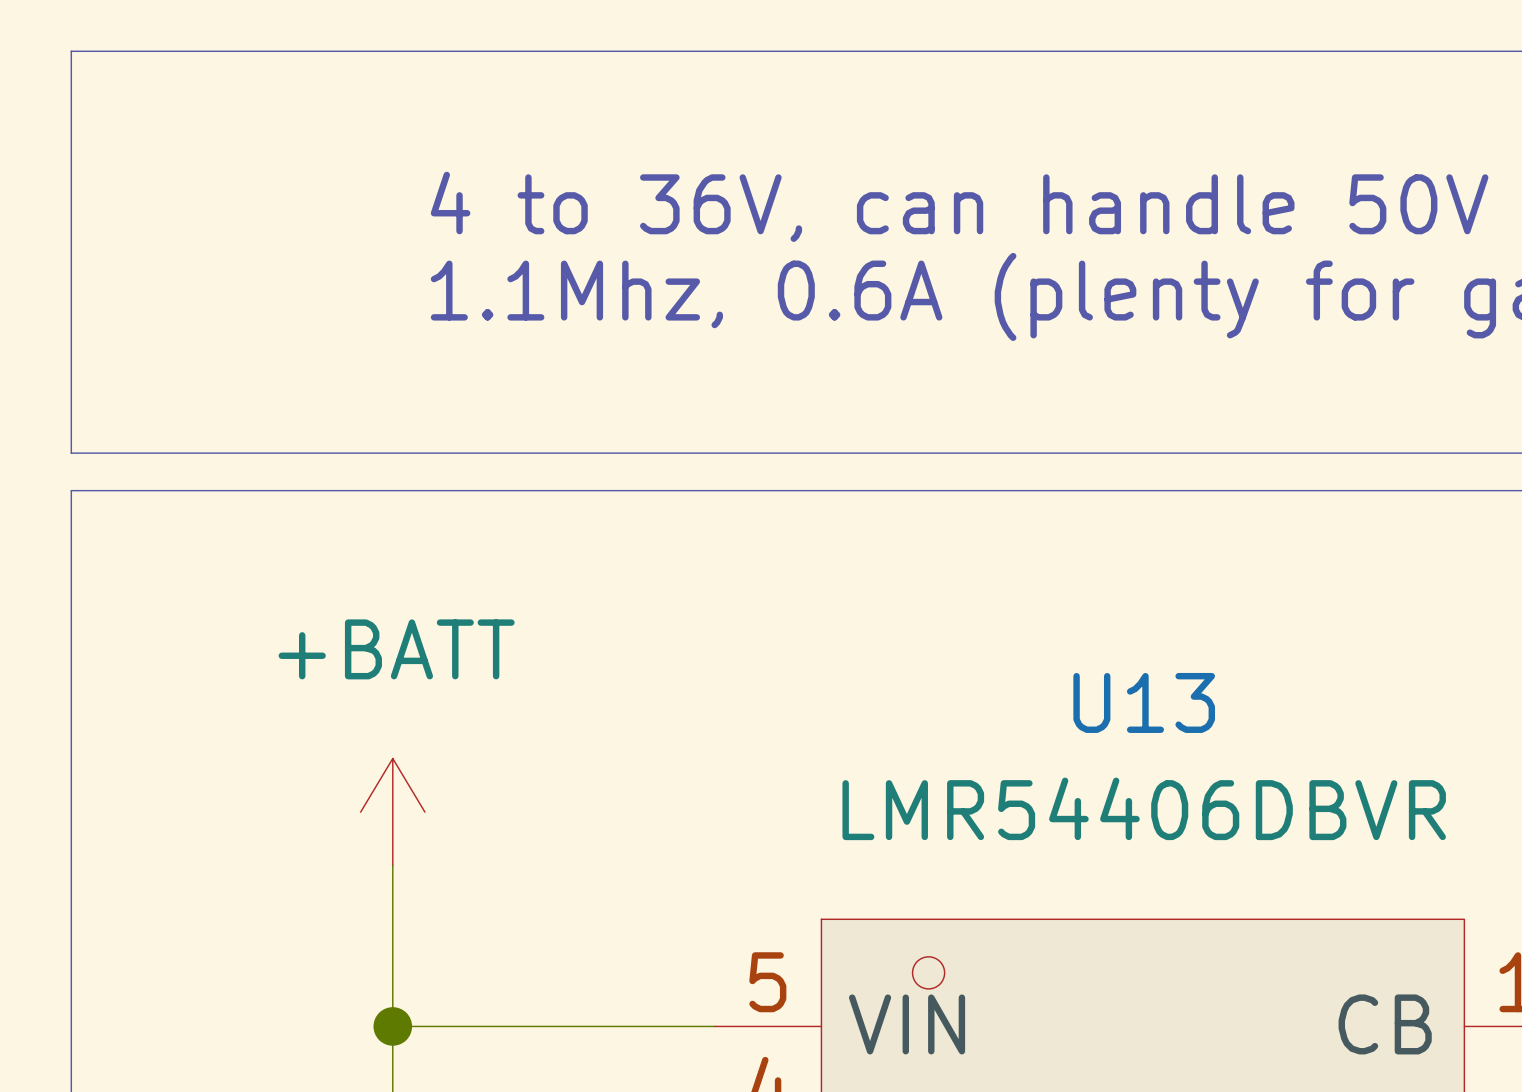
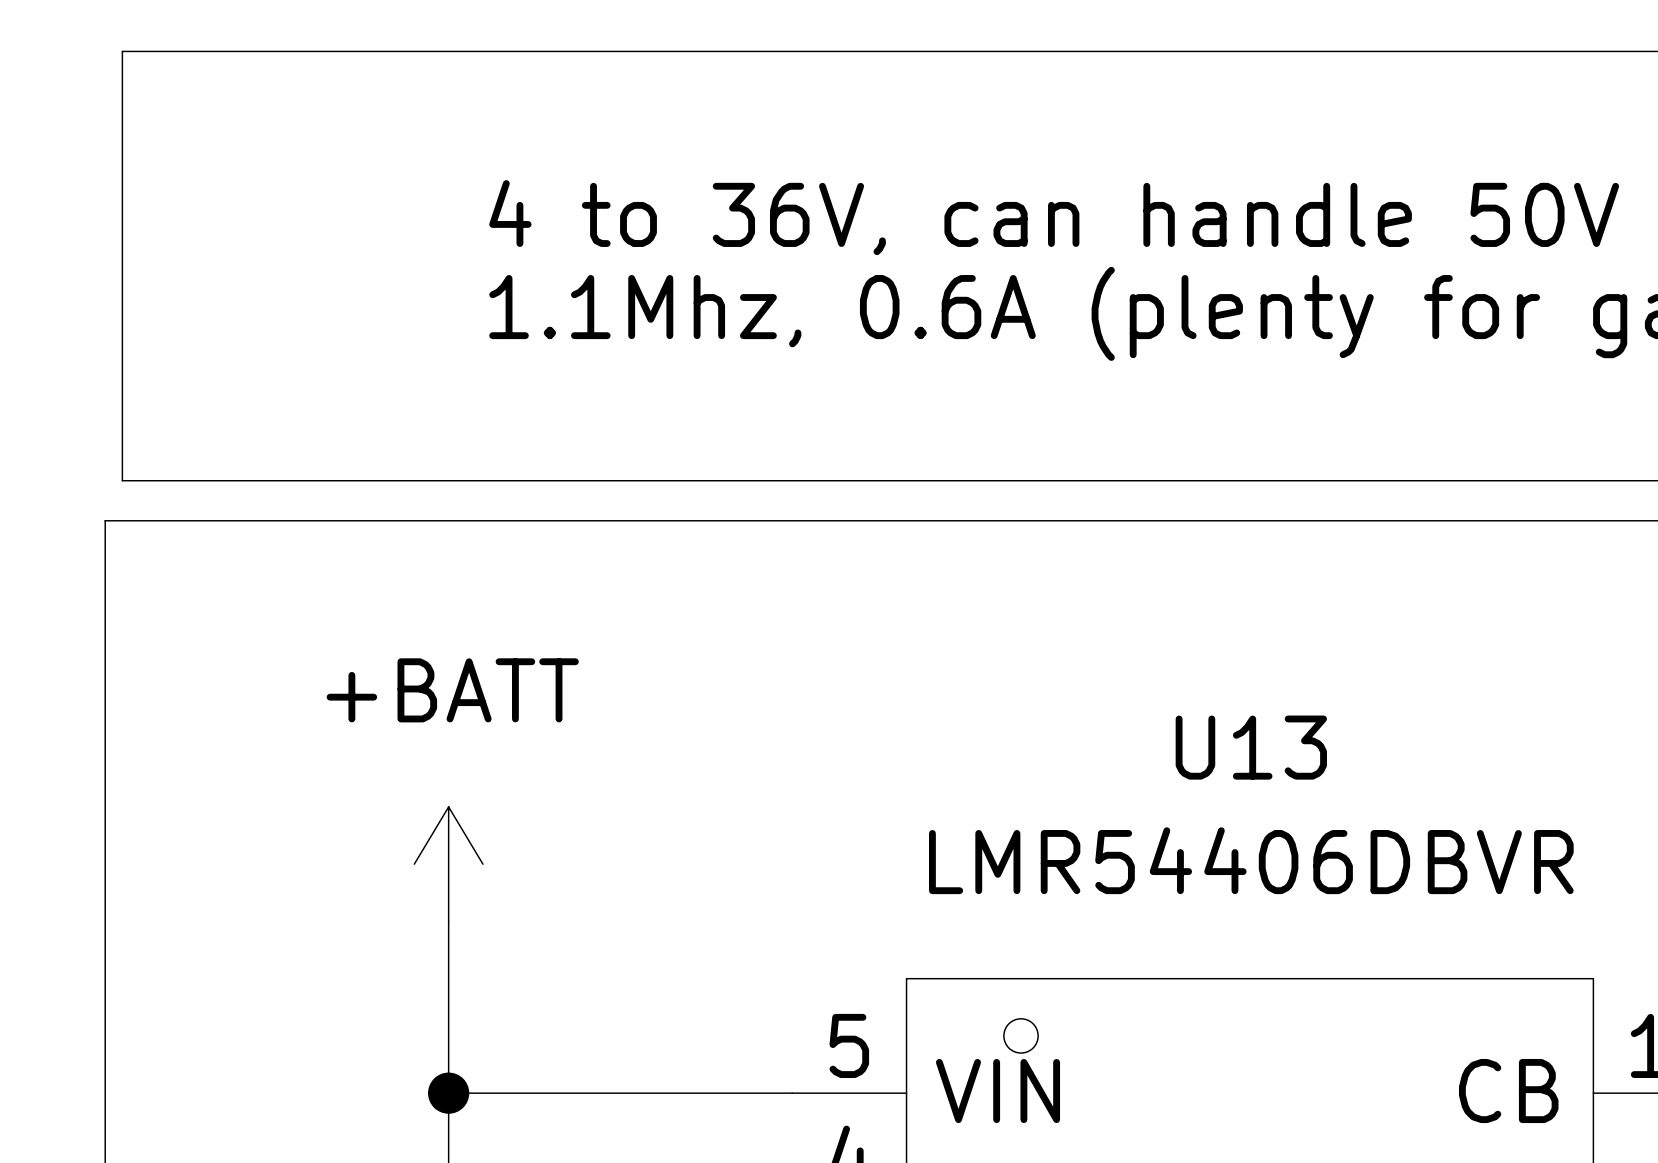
line: (87, 51) (71, 51) (71, 453) (87, 453) -> (122, 51) (122, 480)

